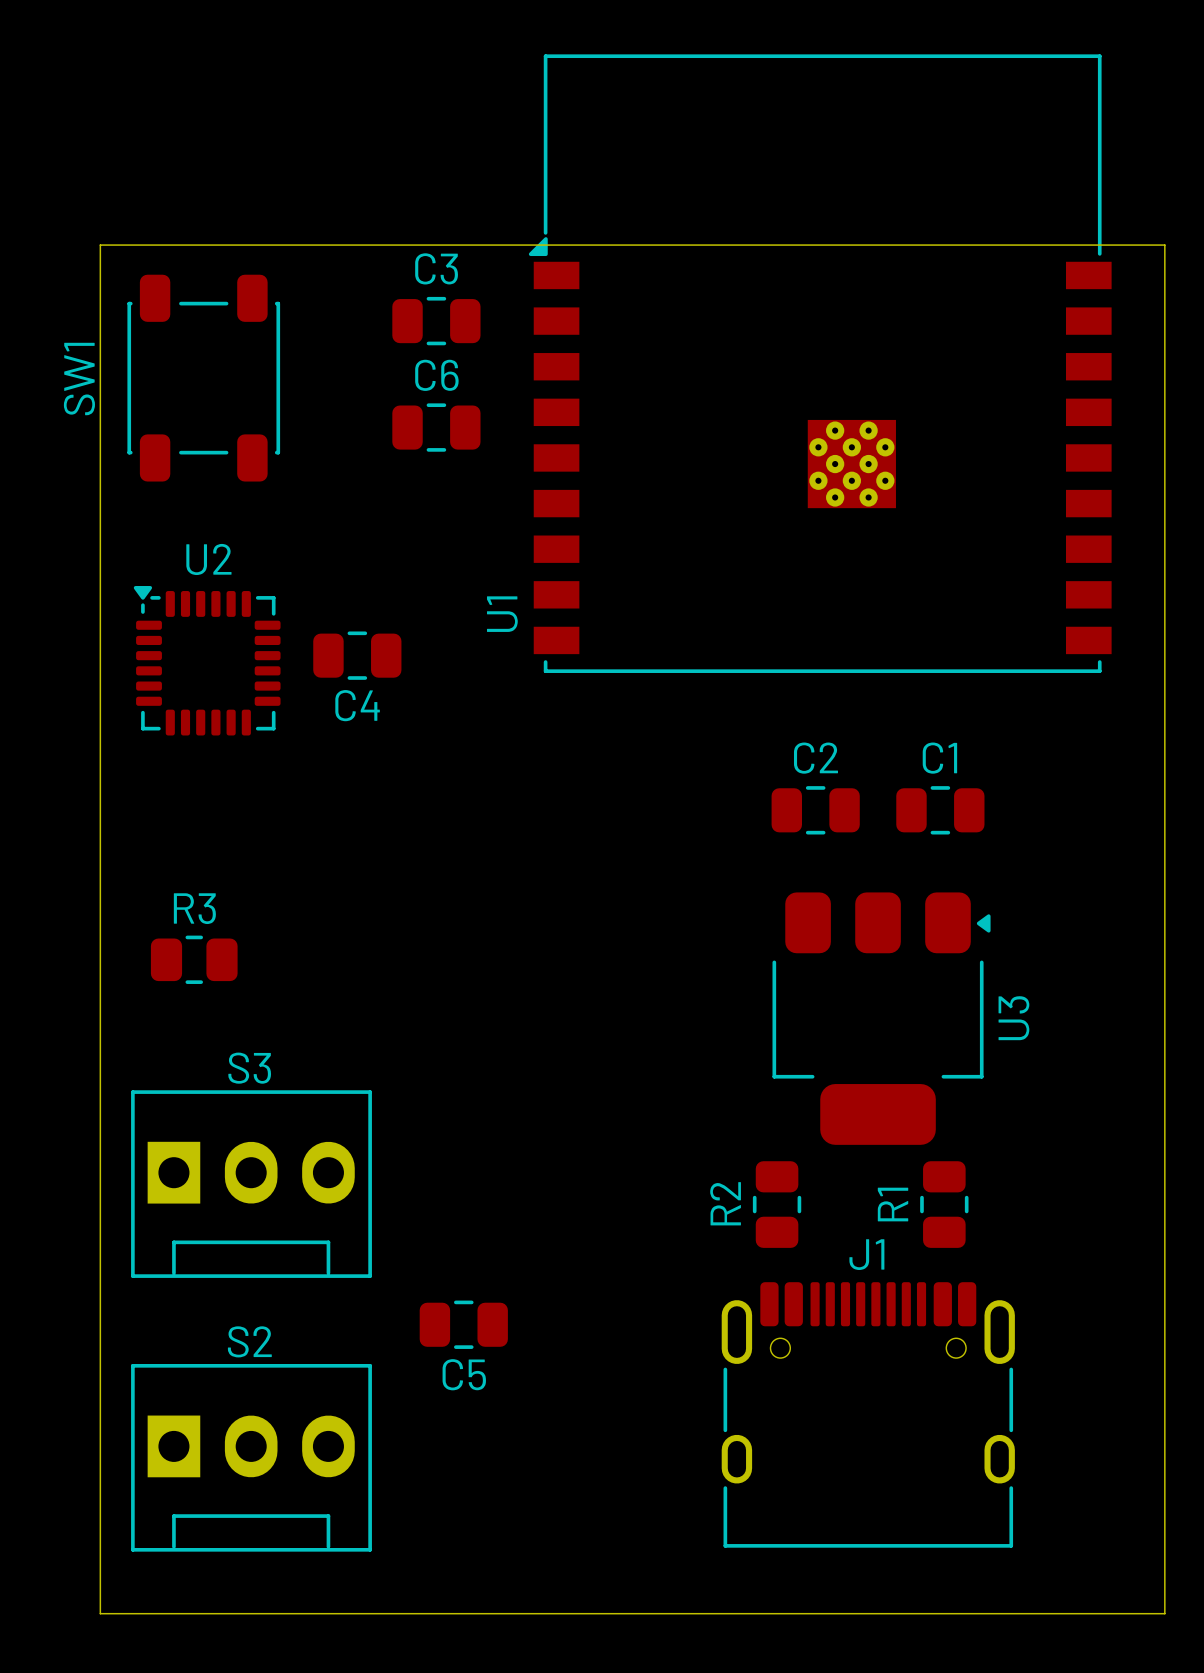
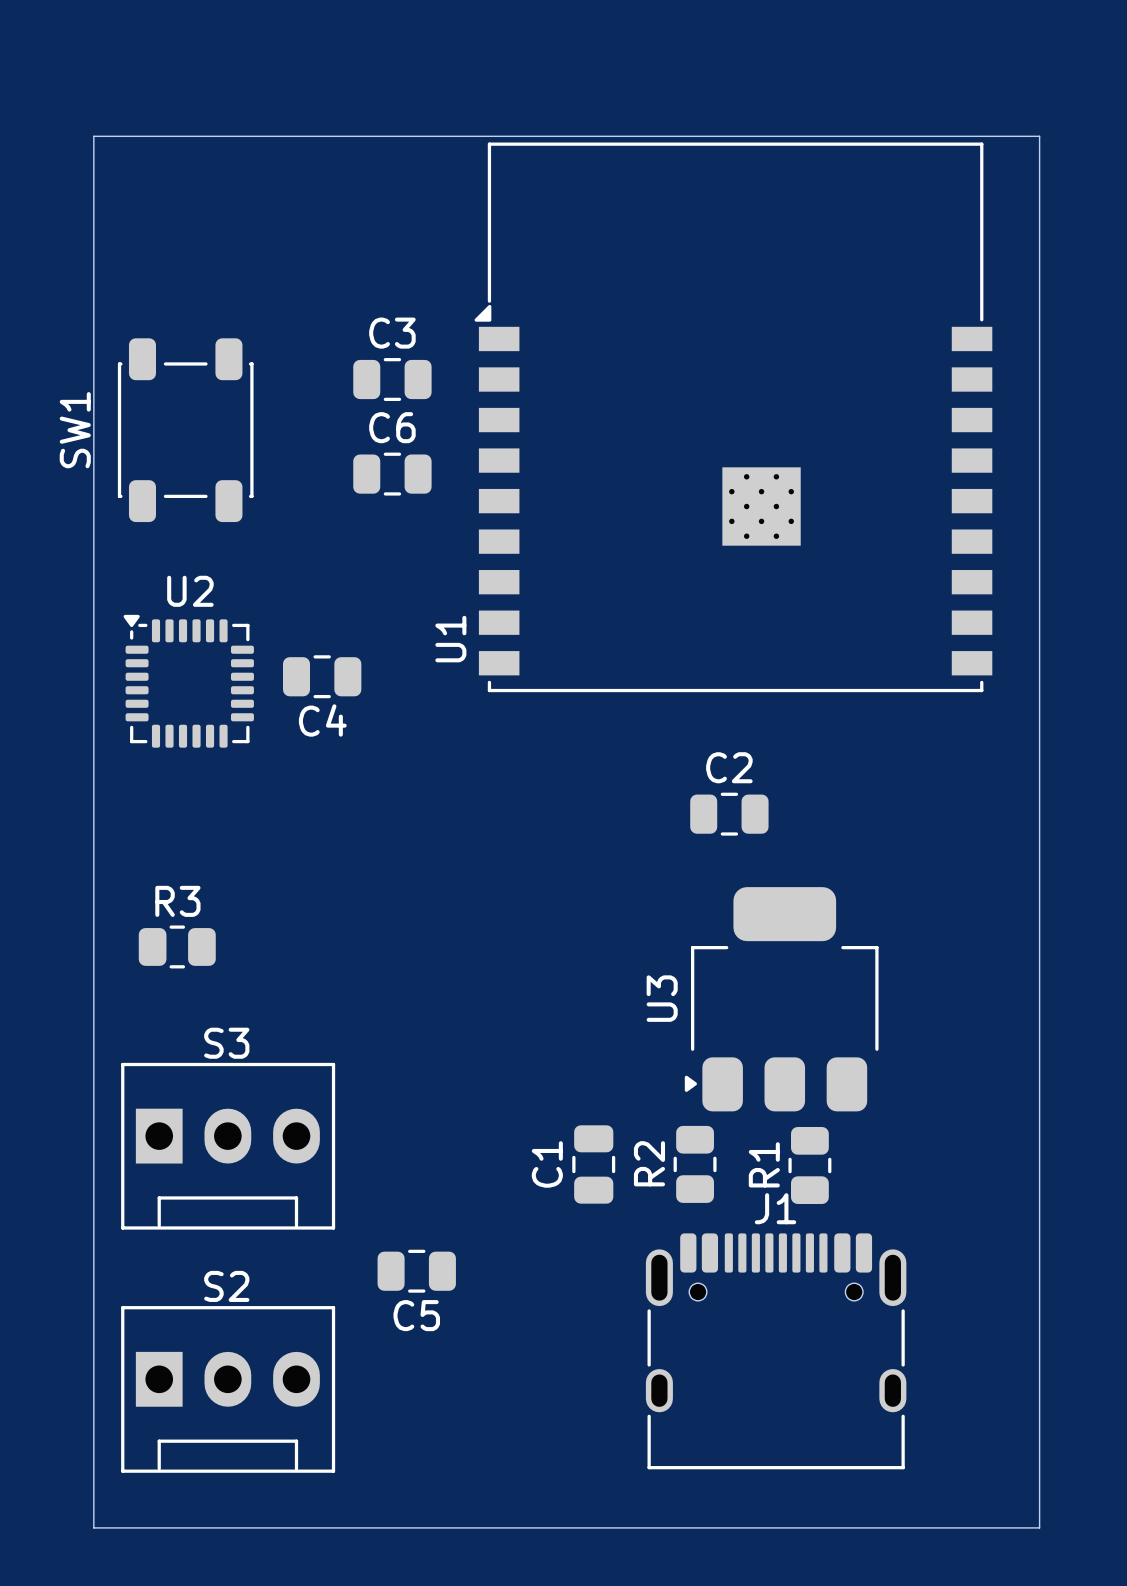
board edge: (100, 245) (1164, 245) -> (93, 311) (93, 136) (1039, 136) (1039, 311)
C1 name position: C1 (939, 758) -> C1 (547, 1164)
C1 rotation: 0° (940, 810) -> 90° clockwise (593, 1164)
C1 position: (940, 810) -> (593, 1164)
U3 rotation: 0° (881, 1018) -> 180° (781, 999)
R1 position: (944, 1204) -> (809, 1165)

